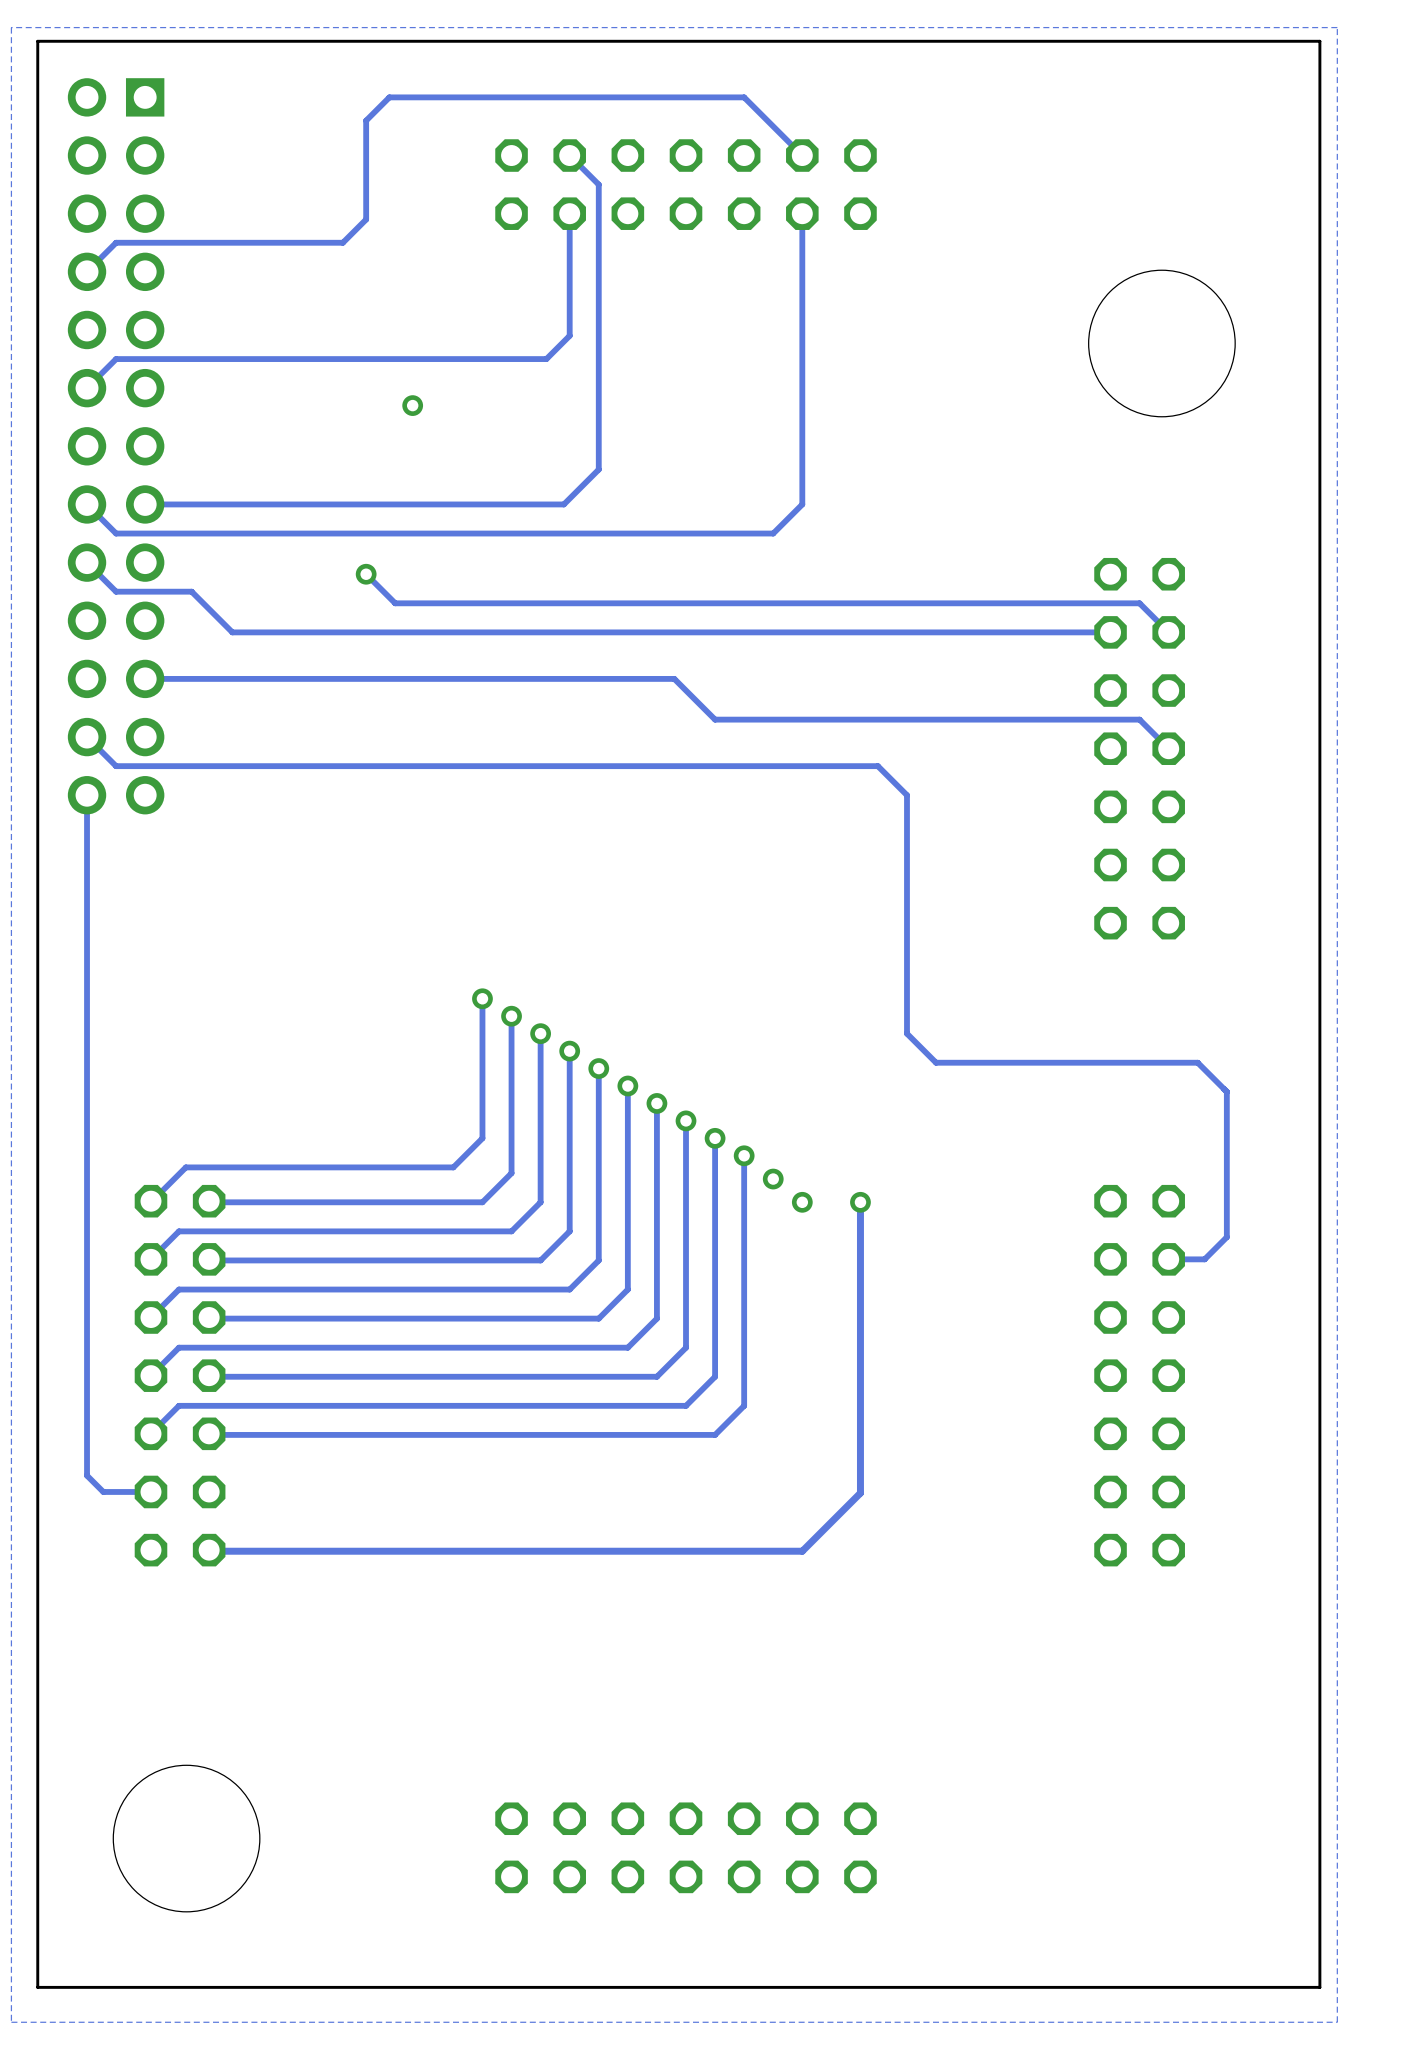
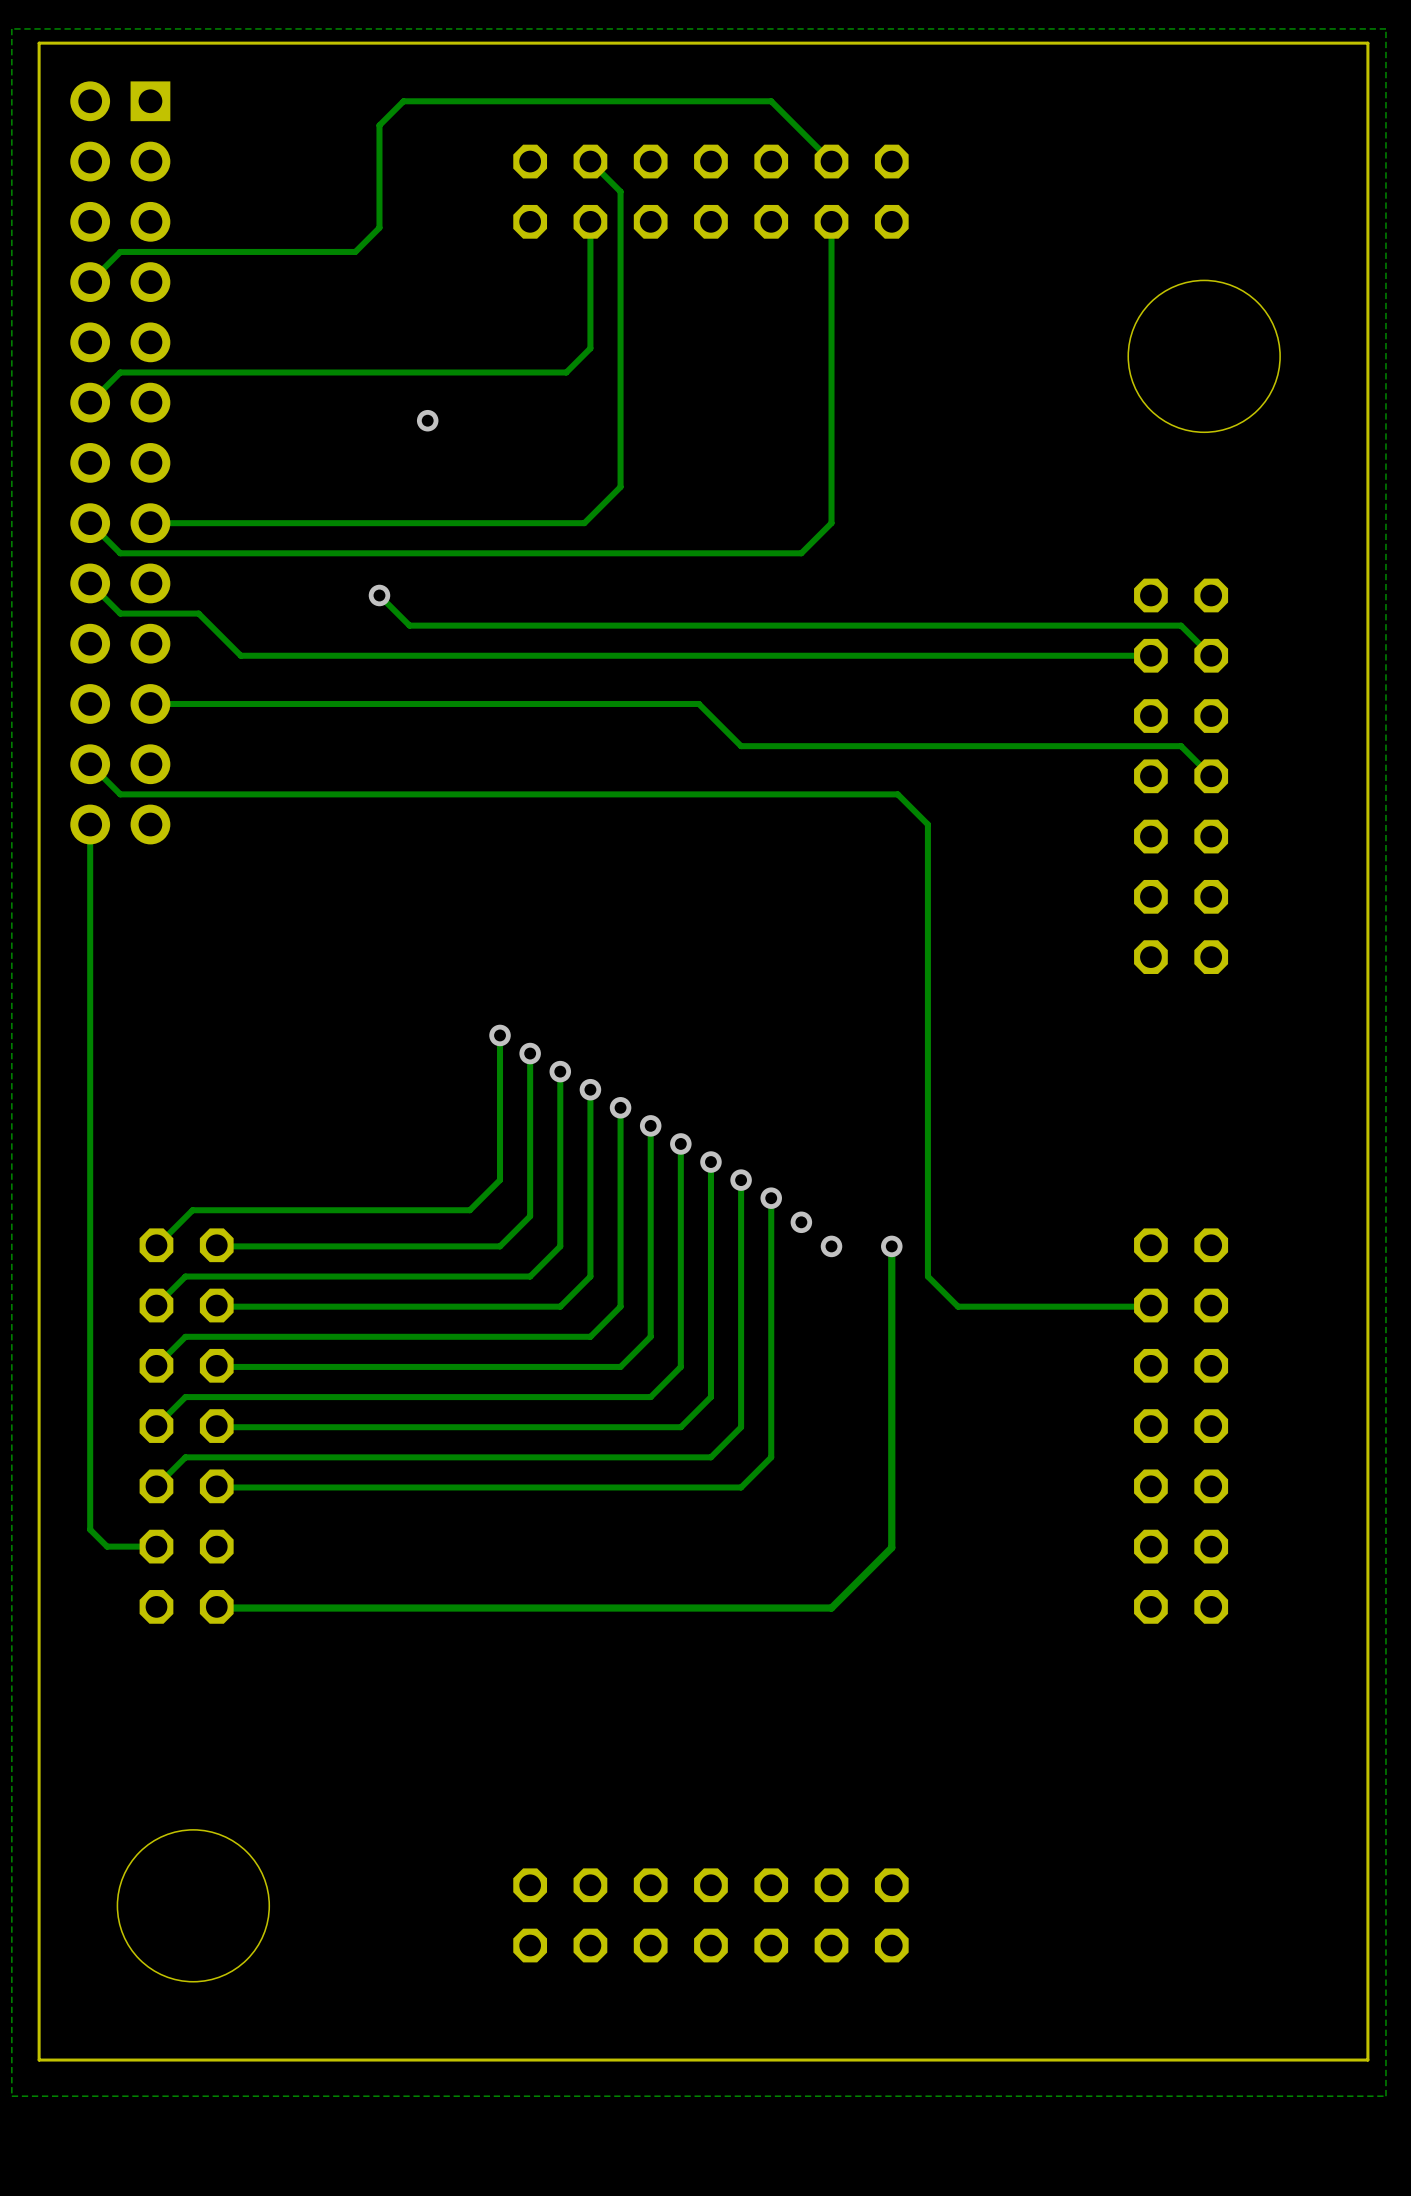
track: (866, 766) (877, 766) (906, 795) (906, 1033) (936, 1062) (1197, 1062) (1226, 1091) (1226, 1237) (1204, 1259) (1168, 1259) -> (897, 794) (927, 824) (927, 1276) (958, 1306) (1150, 1305)

